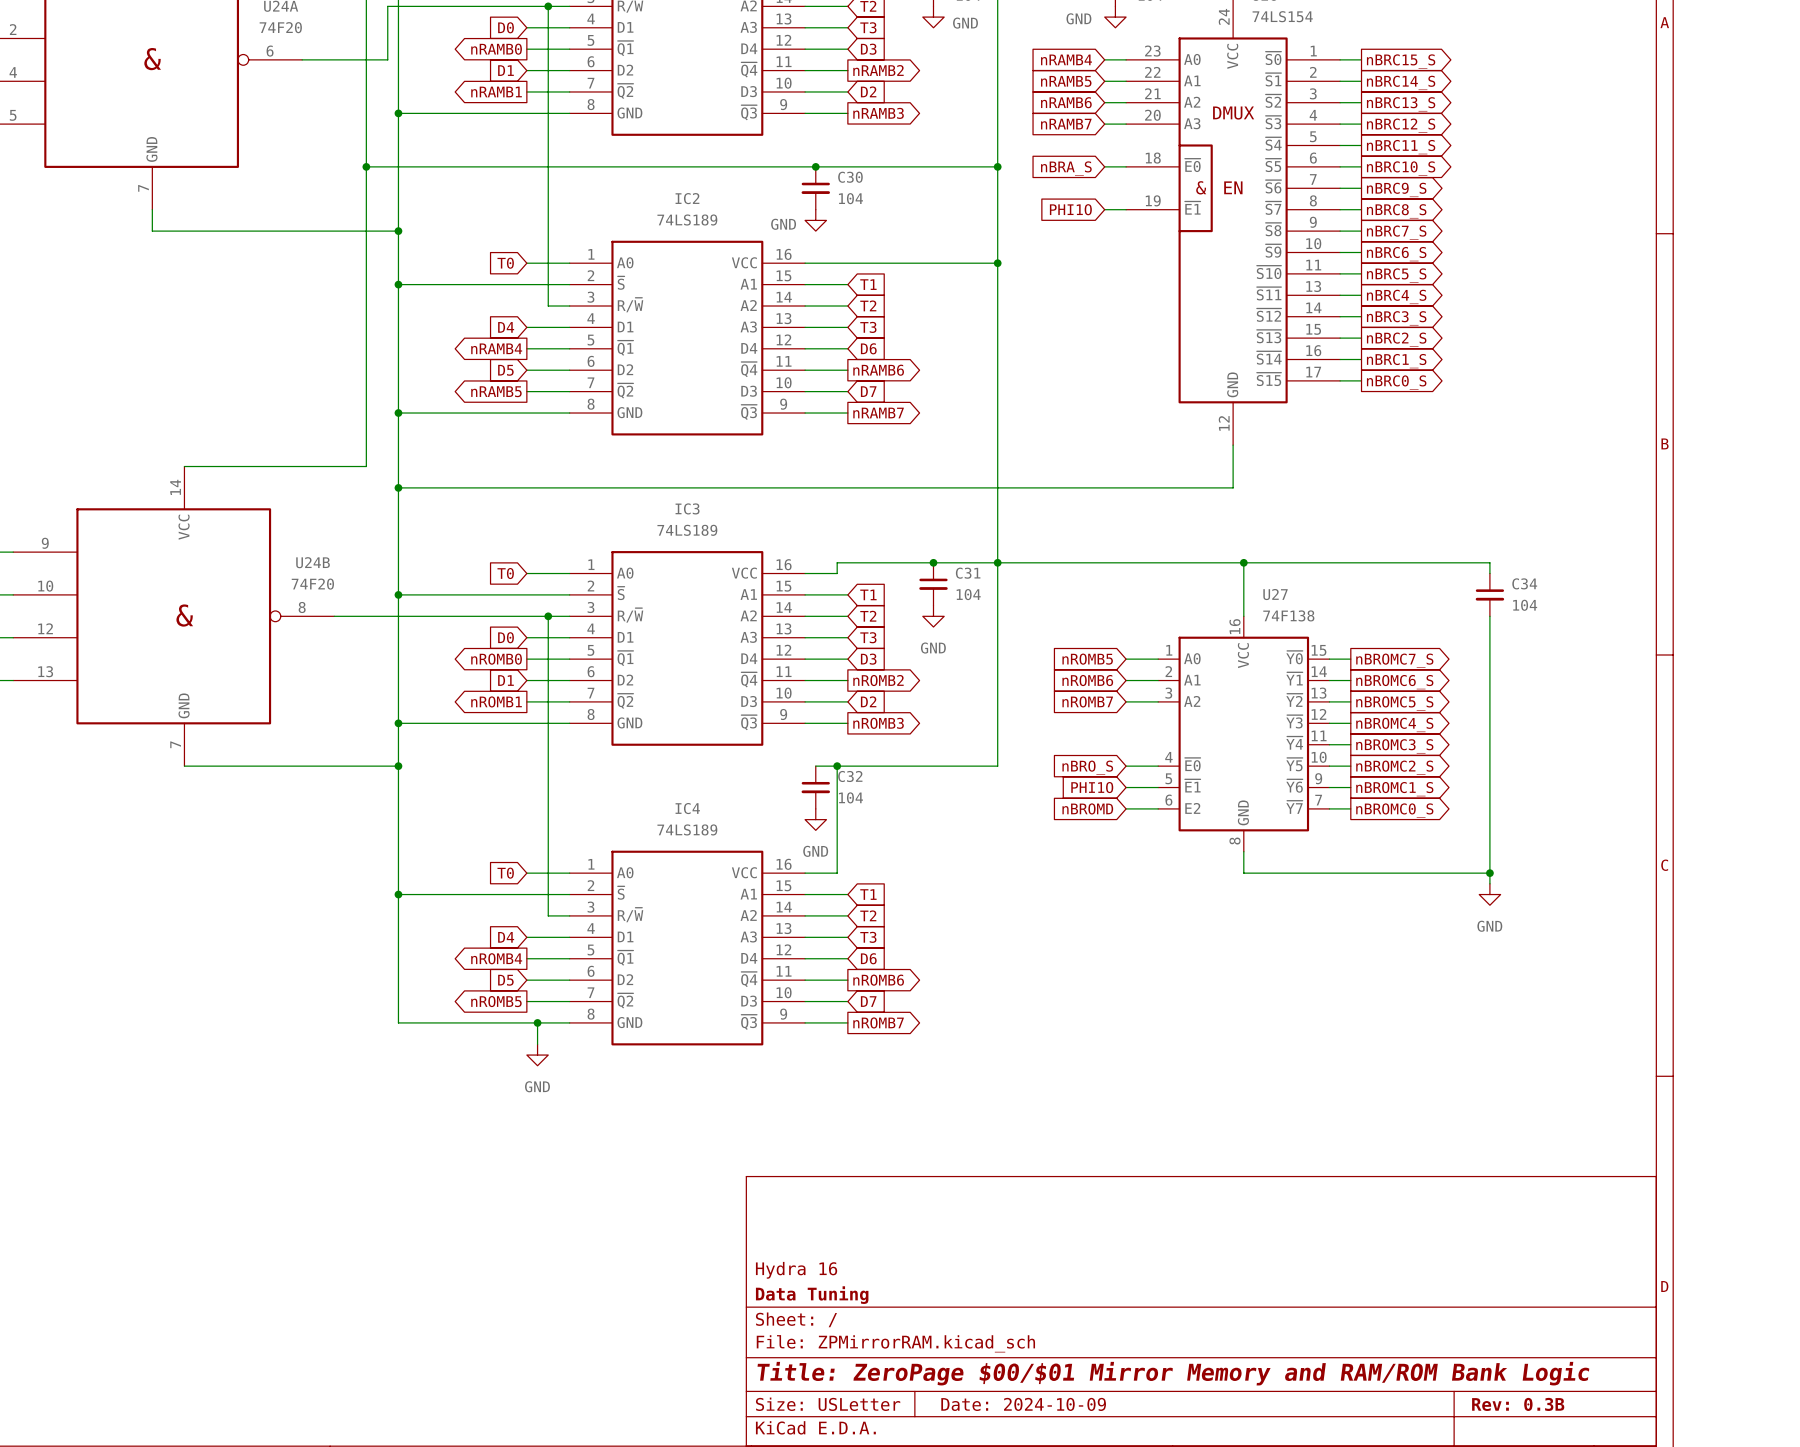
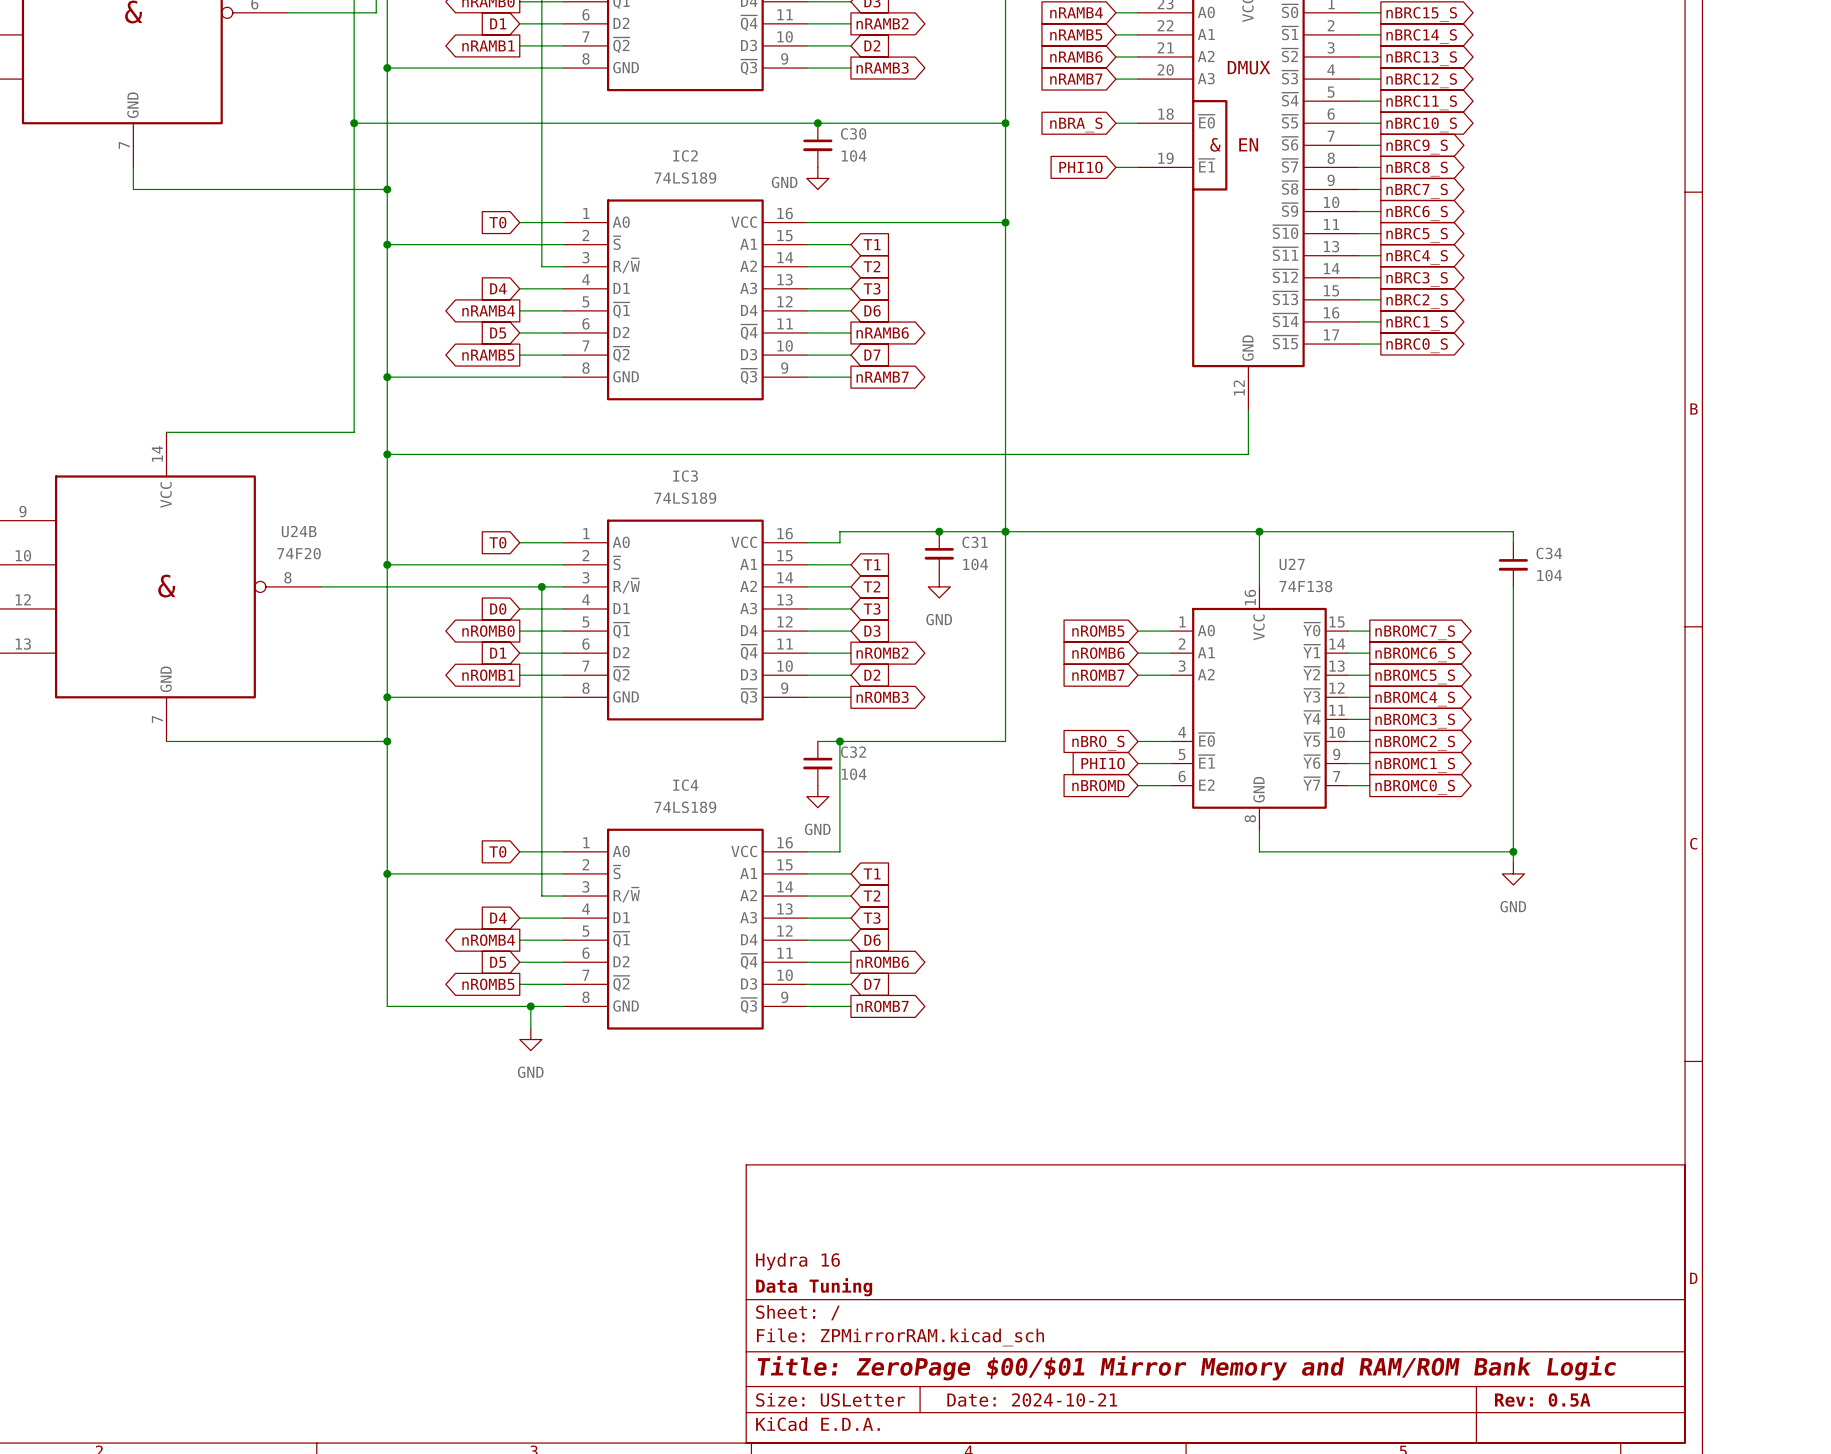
title block: Date: 2024-10-09 (1023, 1404) -> Date: 2024-10-21 (1032, 1399)
title block: Rev: 0.3B (1518, 1404) -> Rev: 0.5A (1542, 1399)

